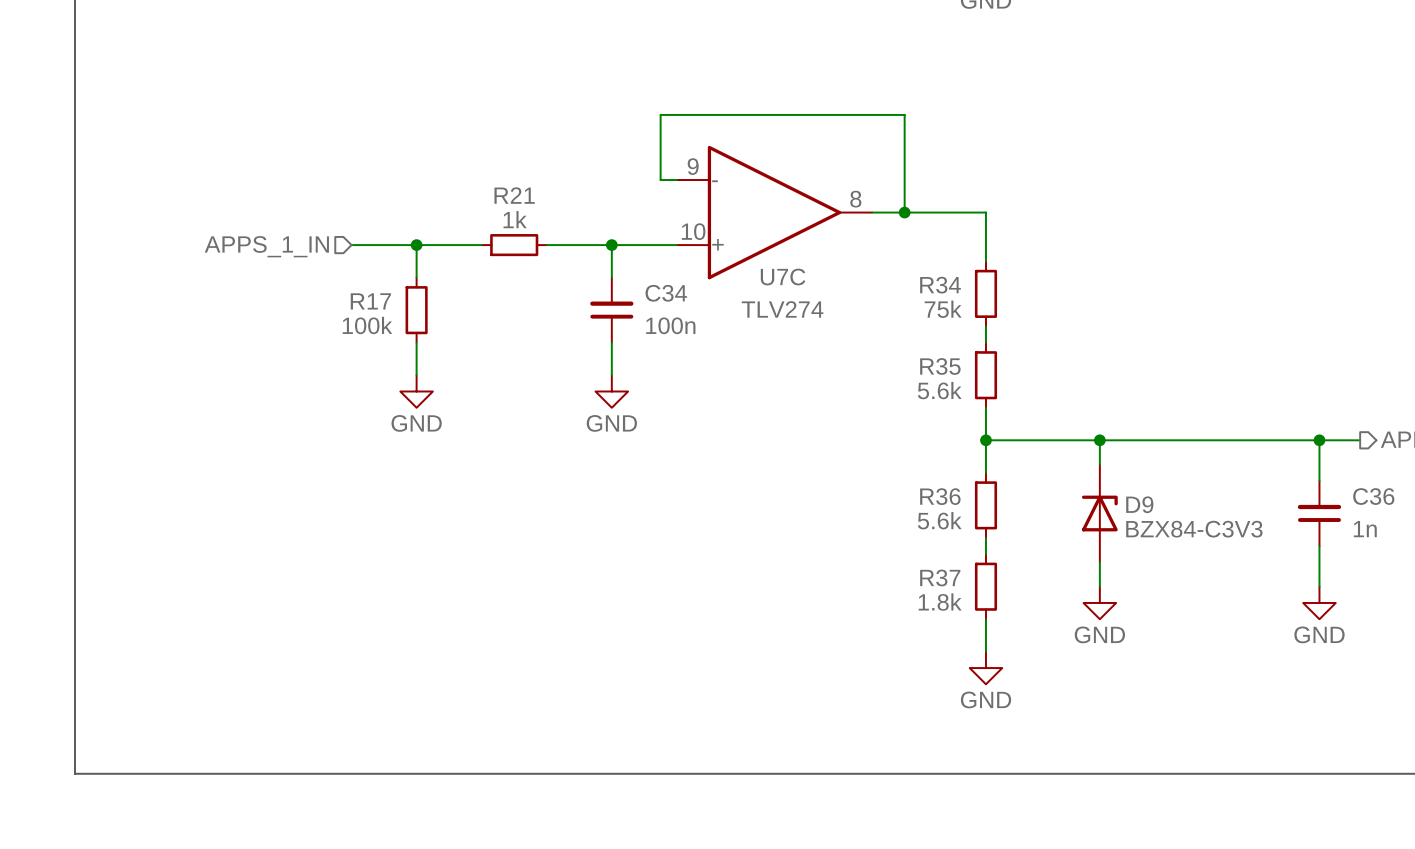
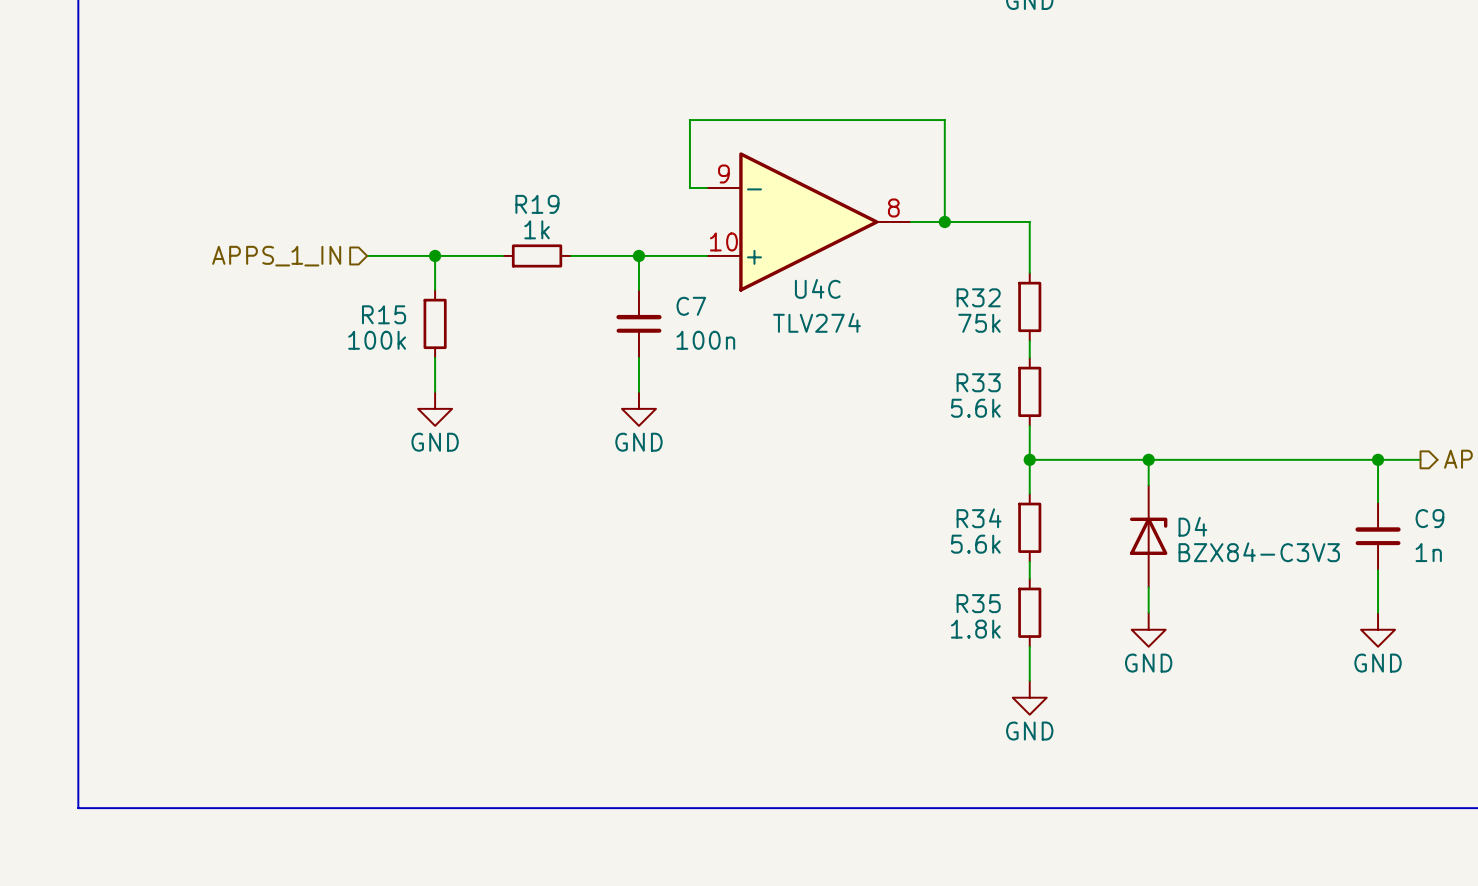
R21 name: R21 (514, 195) -> R19 (537, 204)
U7C name: U7C (783, 277) -> U4C (817, 288)
R34 name: R34 (940, 285) -> R32 (978, 297)
C34 name: C34 (666, 293) -> C7 (691, 306)
R17 name: R17 (370, 301) -> R15 (384, 314)
R35 name: R35 (940, 366) -> R33 (978, 382)
R36 name: R36 (940, 496) -> R34 (979, 518)
C36 name: C36 (1373, 496) -> C9 (1429, 518)
D9 name: D9 (1139, 504) -> D4 (1192, 526)
R37 name: R37 (940, 577) -> R35 (978, 603)

